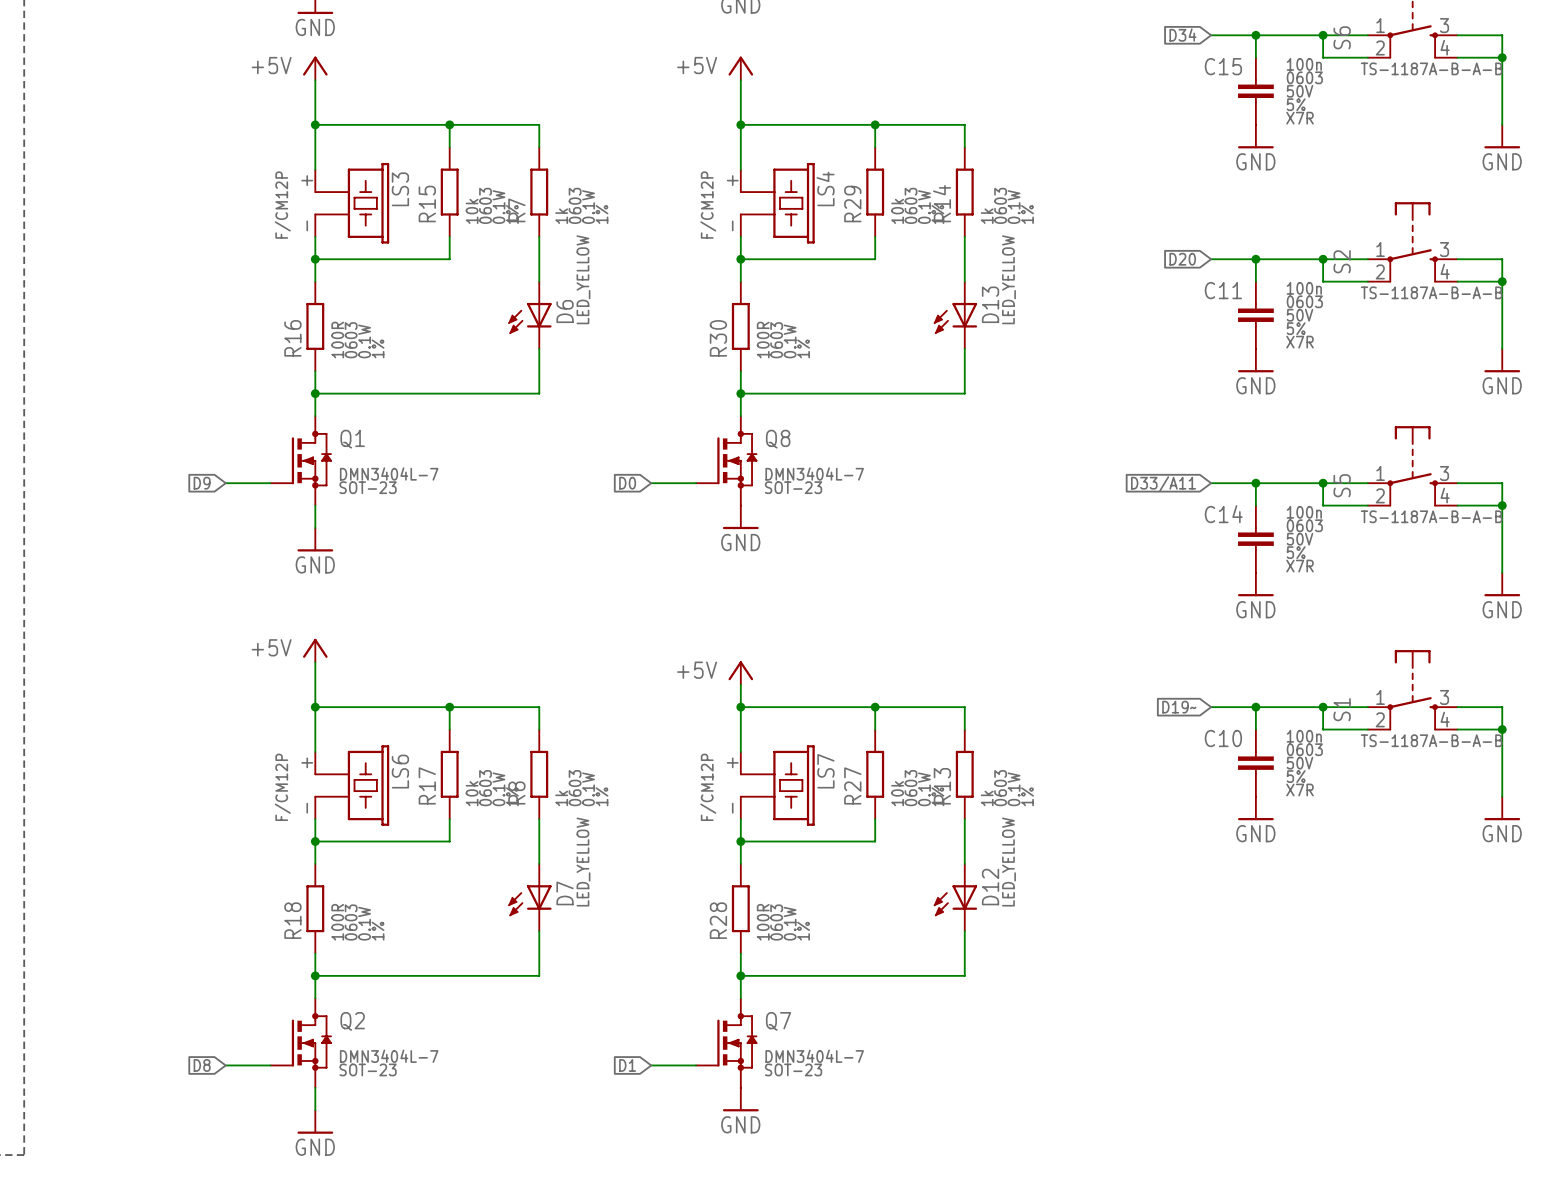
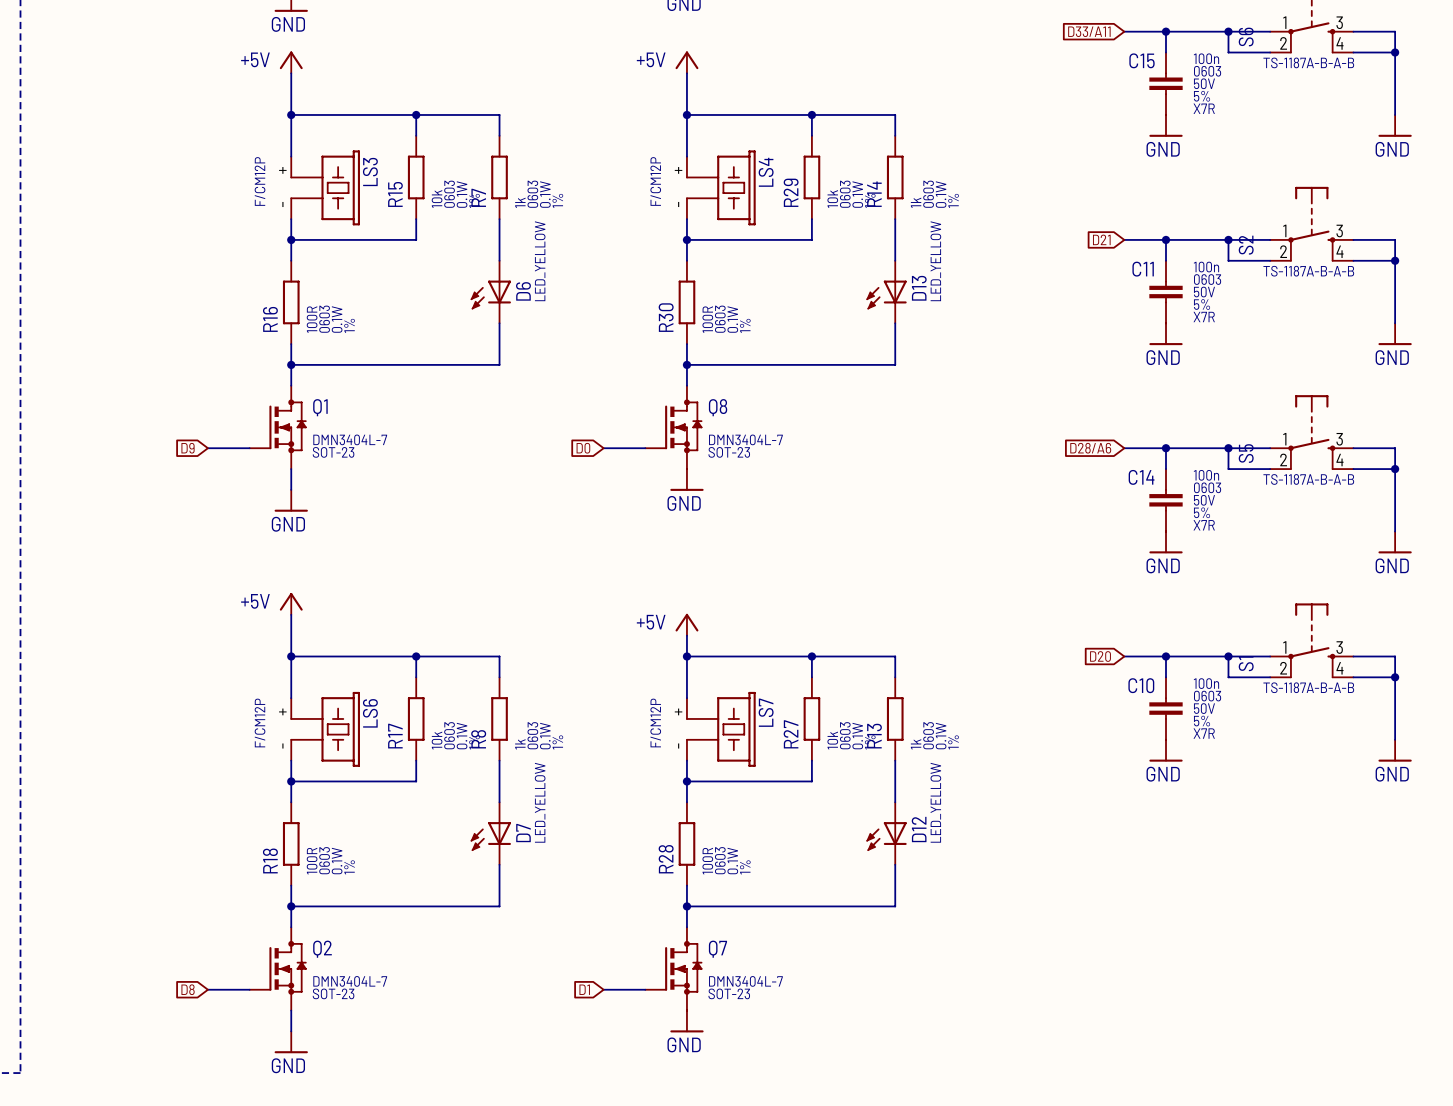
global label: D34 (1182, 35) -> D33/A11 (1089, 31)
global label: D20 (1182, 259) -> D21 (1101, 239)
global label: D33/A11 (1163, 484) -> D28/A6 (1090, 448)
global label: D19~ (1179, 707) -> D20 (1100, 656)

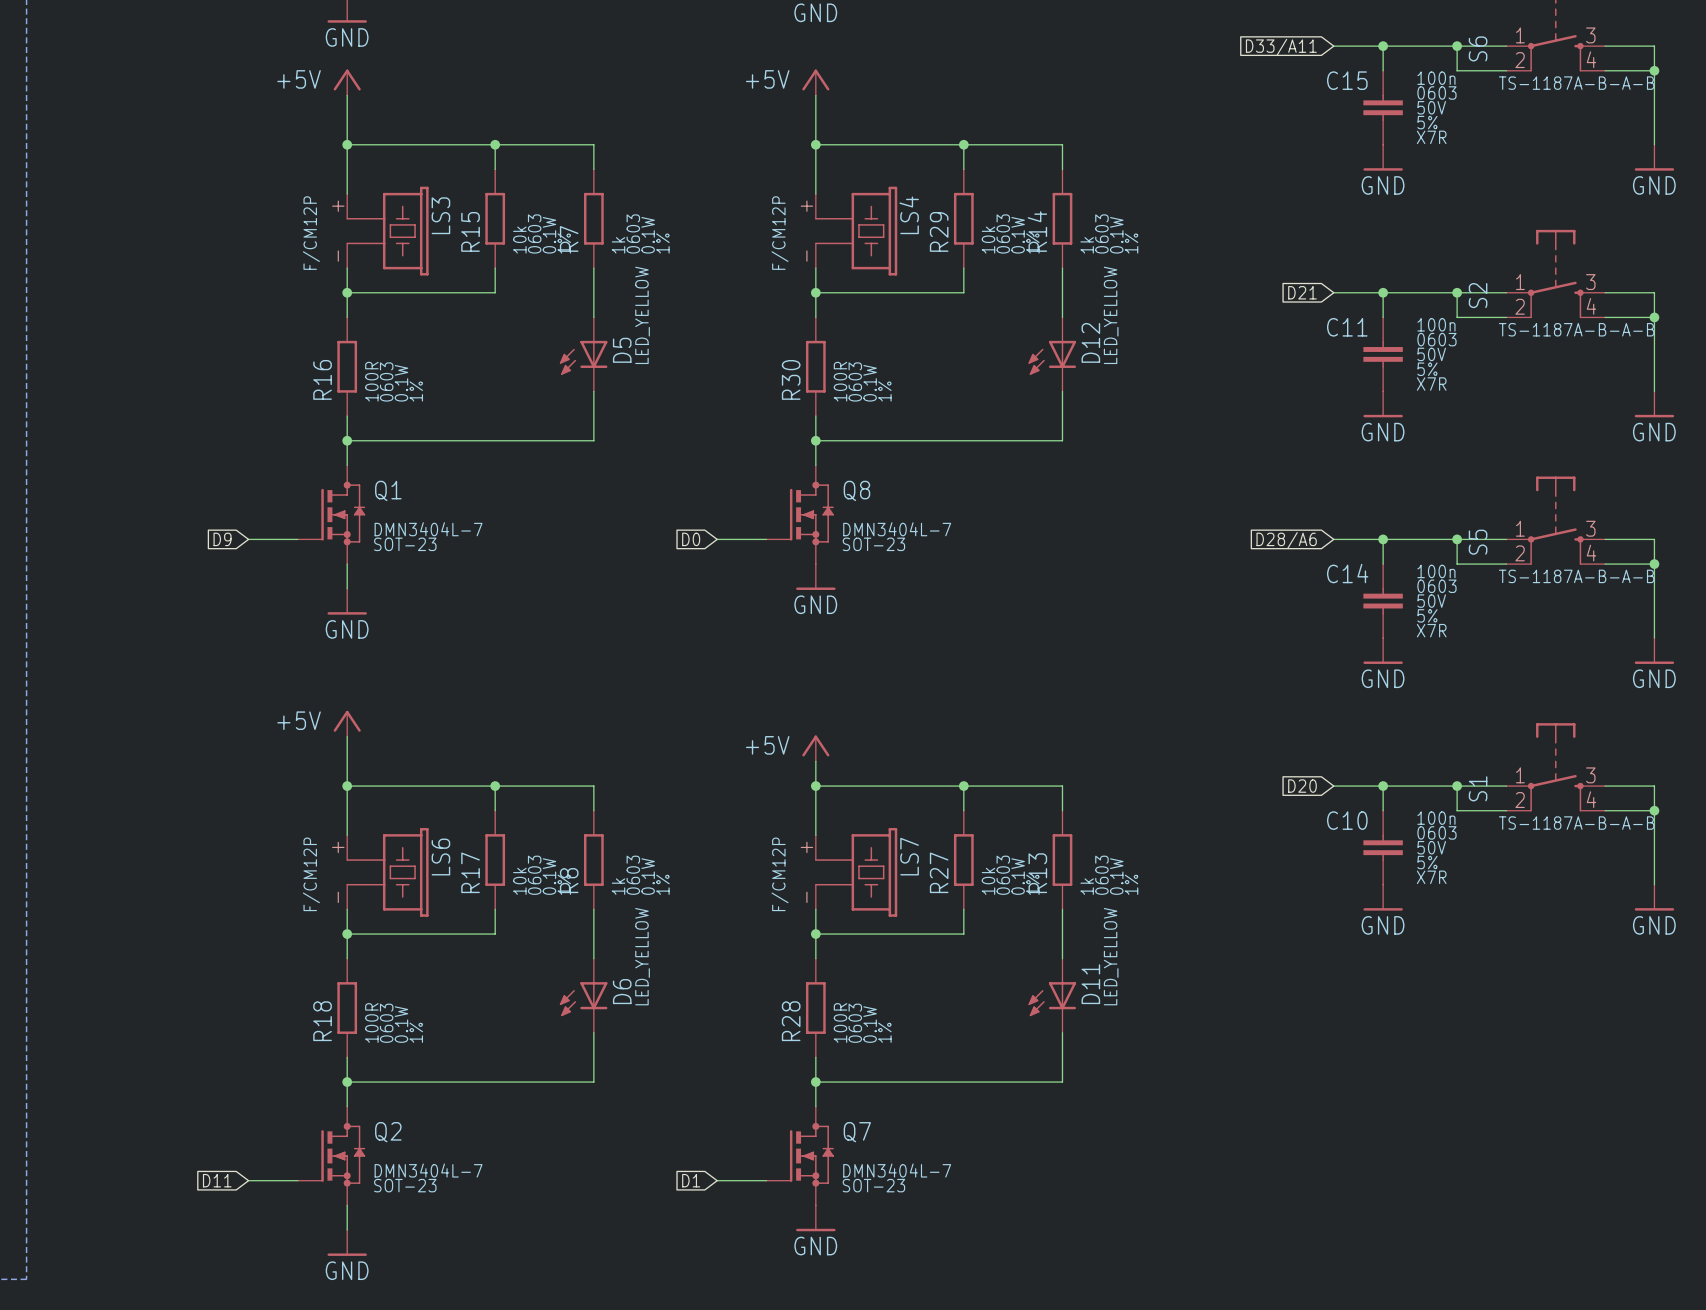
D13 name: D13 (919, 288) -> D12 (1090, 342)
D6 name: D6 (523, 291) -> D5 (622, 350)
D12 name: D12 (919, 829) -> D11 (1090, 984)
D7 name: D7 (523, 833) -> D6 (622, 991)
global label: D8 (188, 989) -> D11 (217, 1180)

